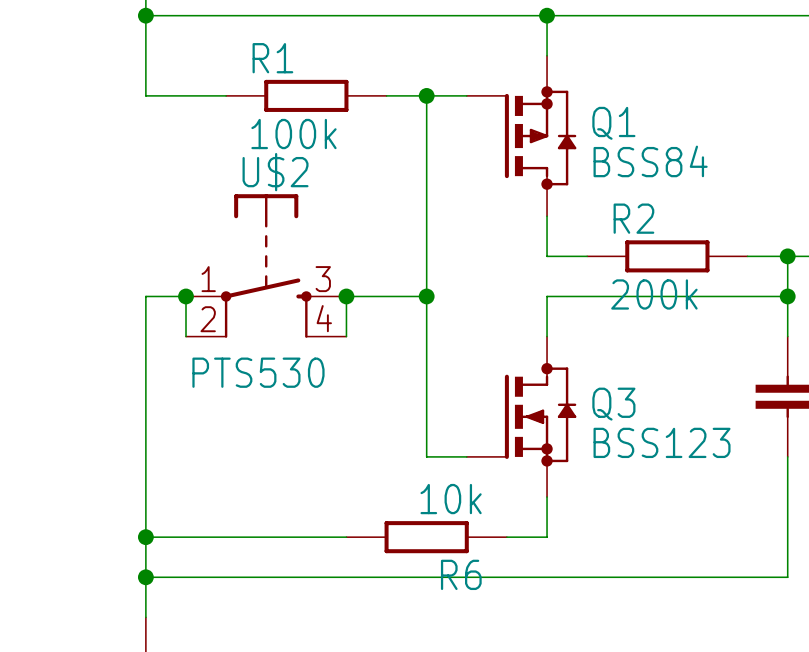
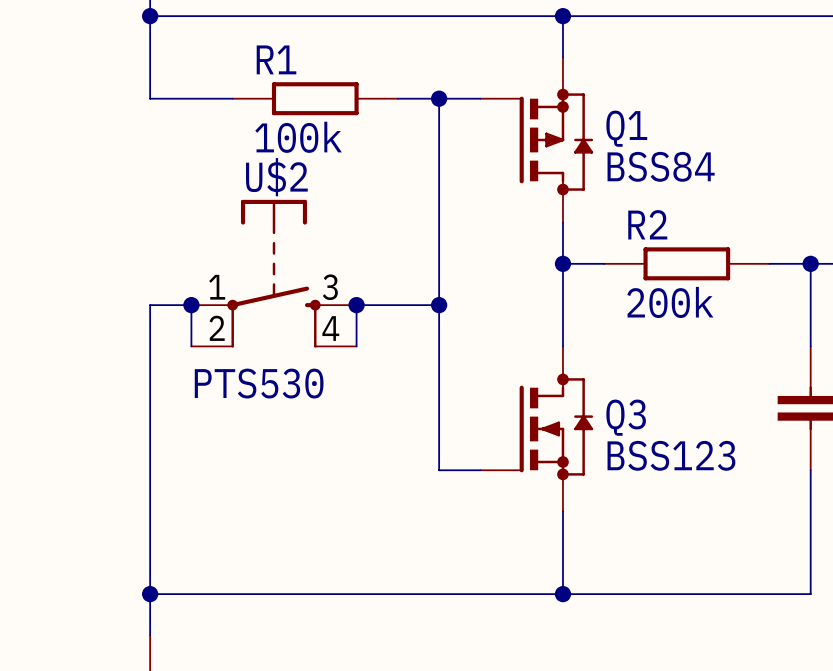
junction: none -> (562, 263)
wire: (547, 296) (787, 296) -> (562, 305) (562, 263)
junction: (787, 296) -> none
wire: (145, 537) (346, 537) -> none
junction: (145, 537) -> none
R6: 10k (426, 537) -> none
wire: (506, 537) (547, 537) -> (562, 594) (562, 552)
junction: none -> (562, 594)

